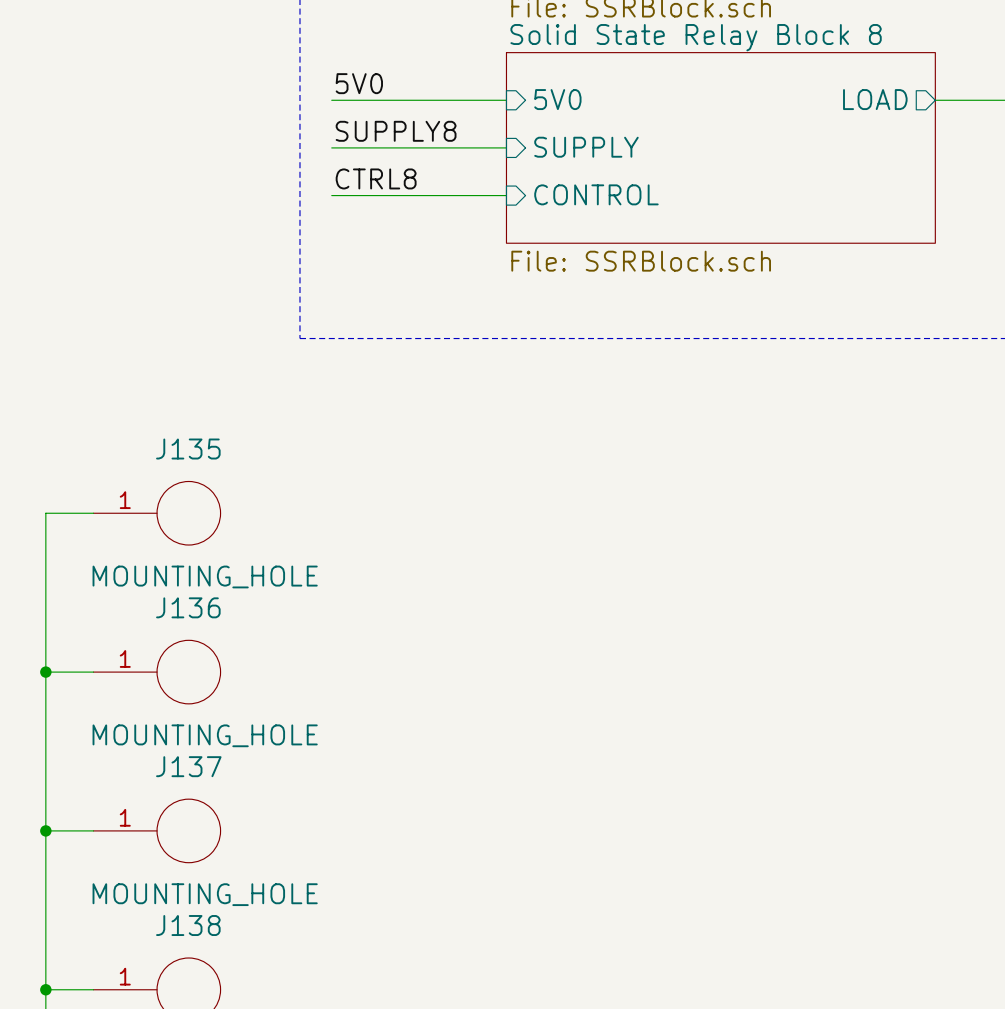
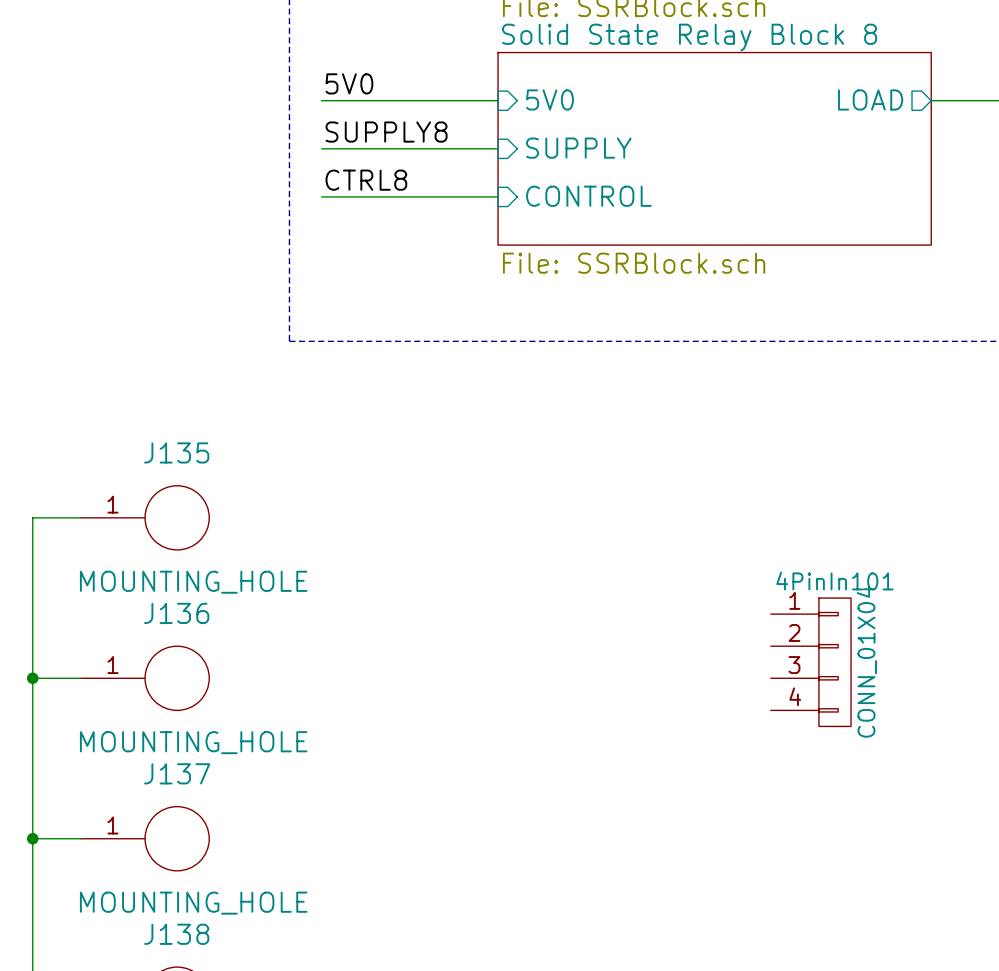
4PinIn101: none -> CONN_01X04 (810, 662)

